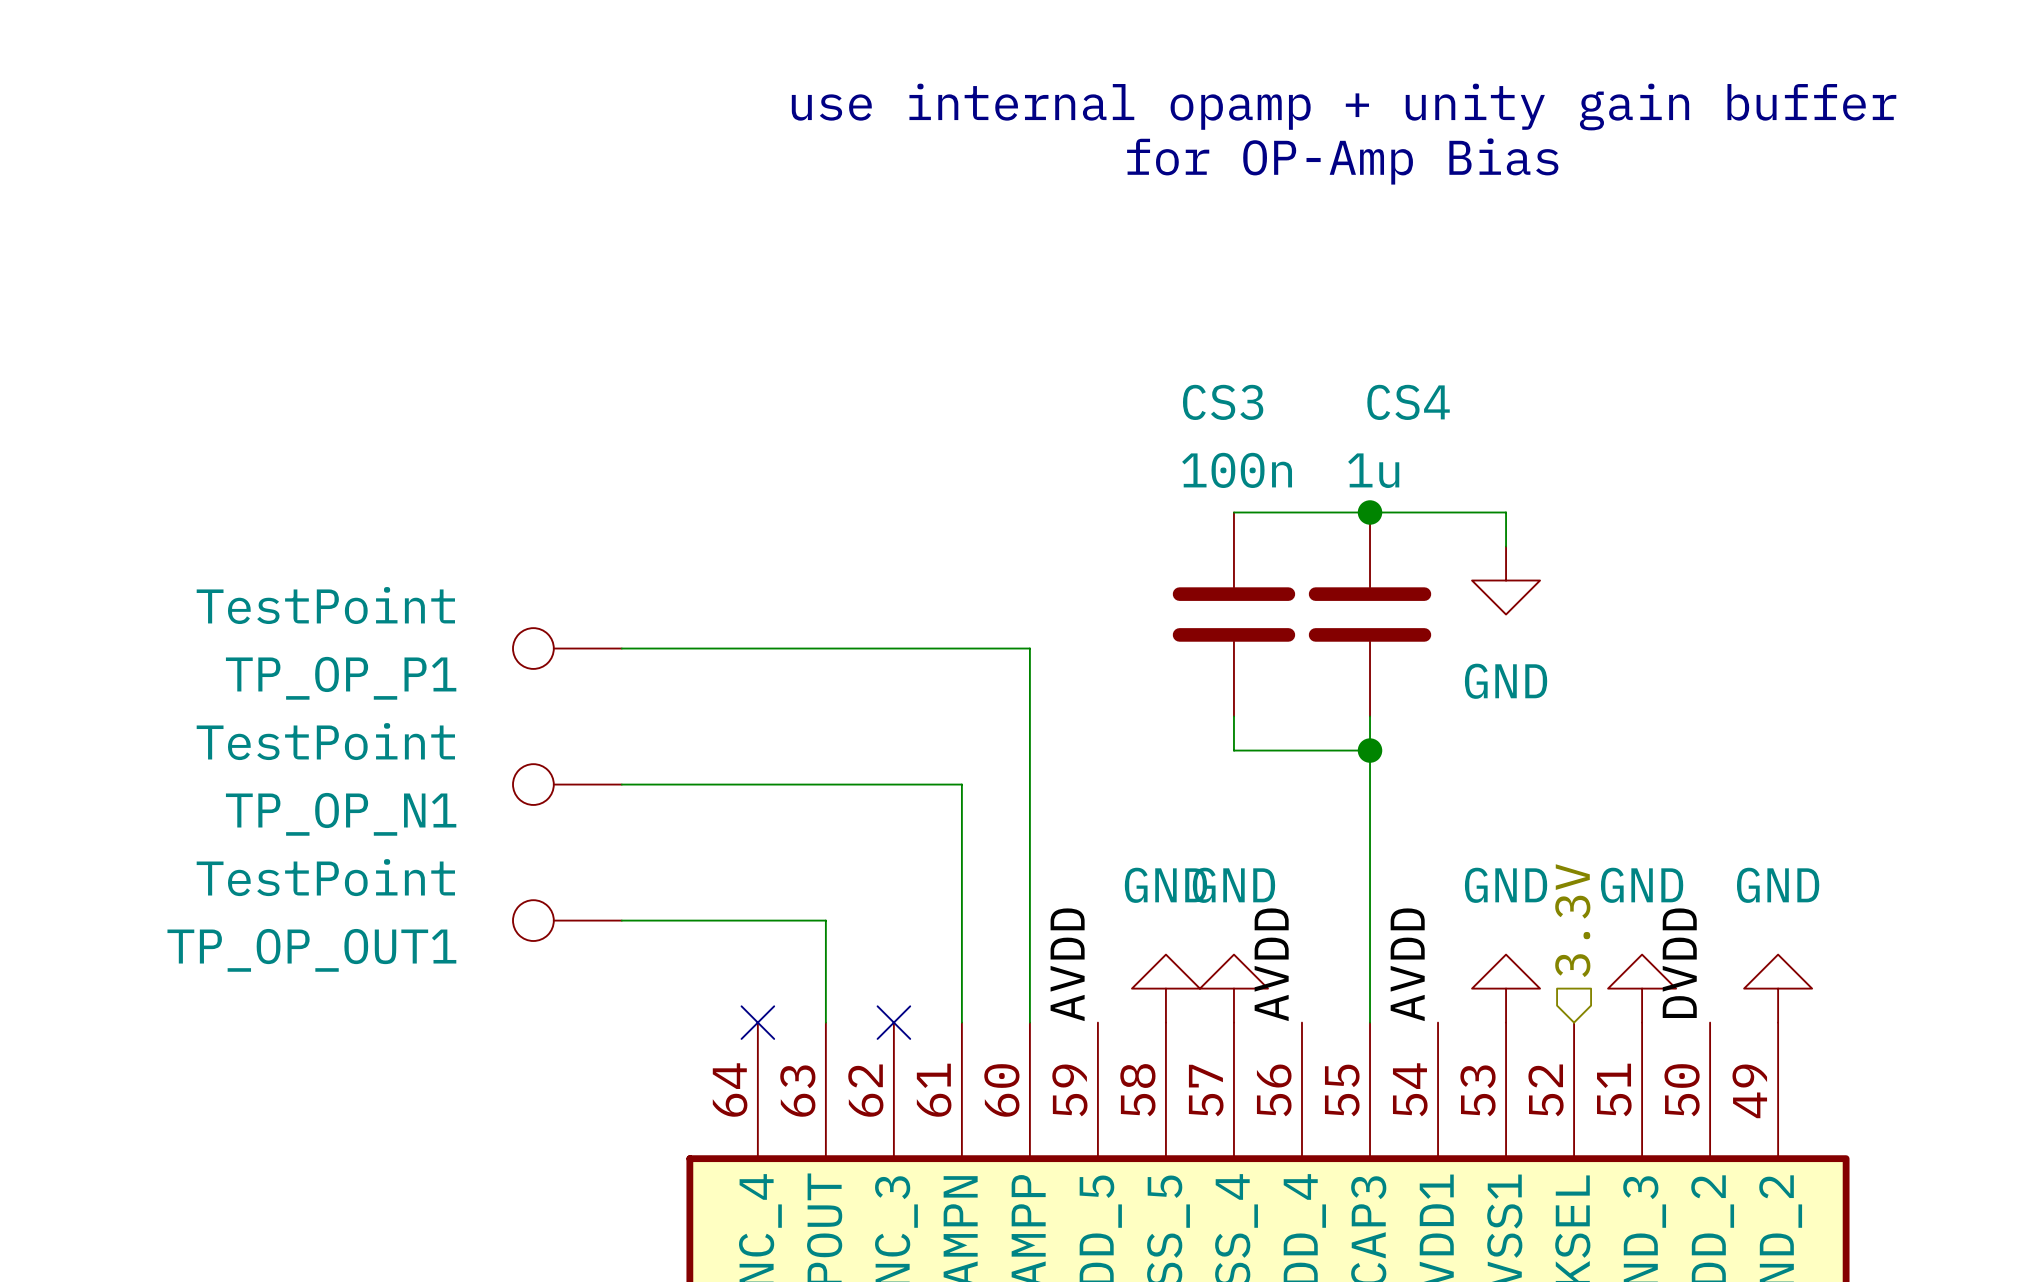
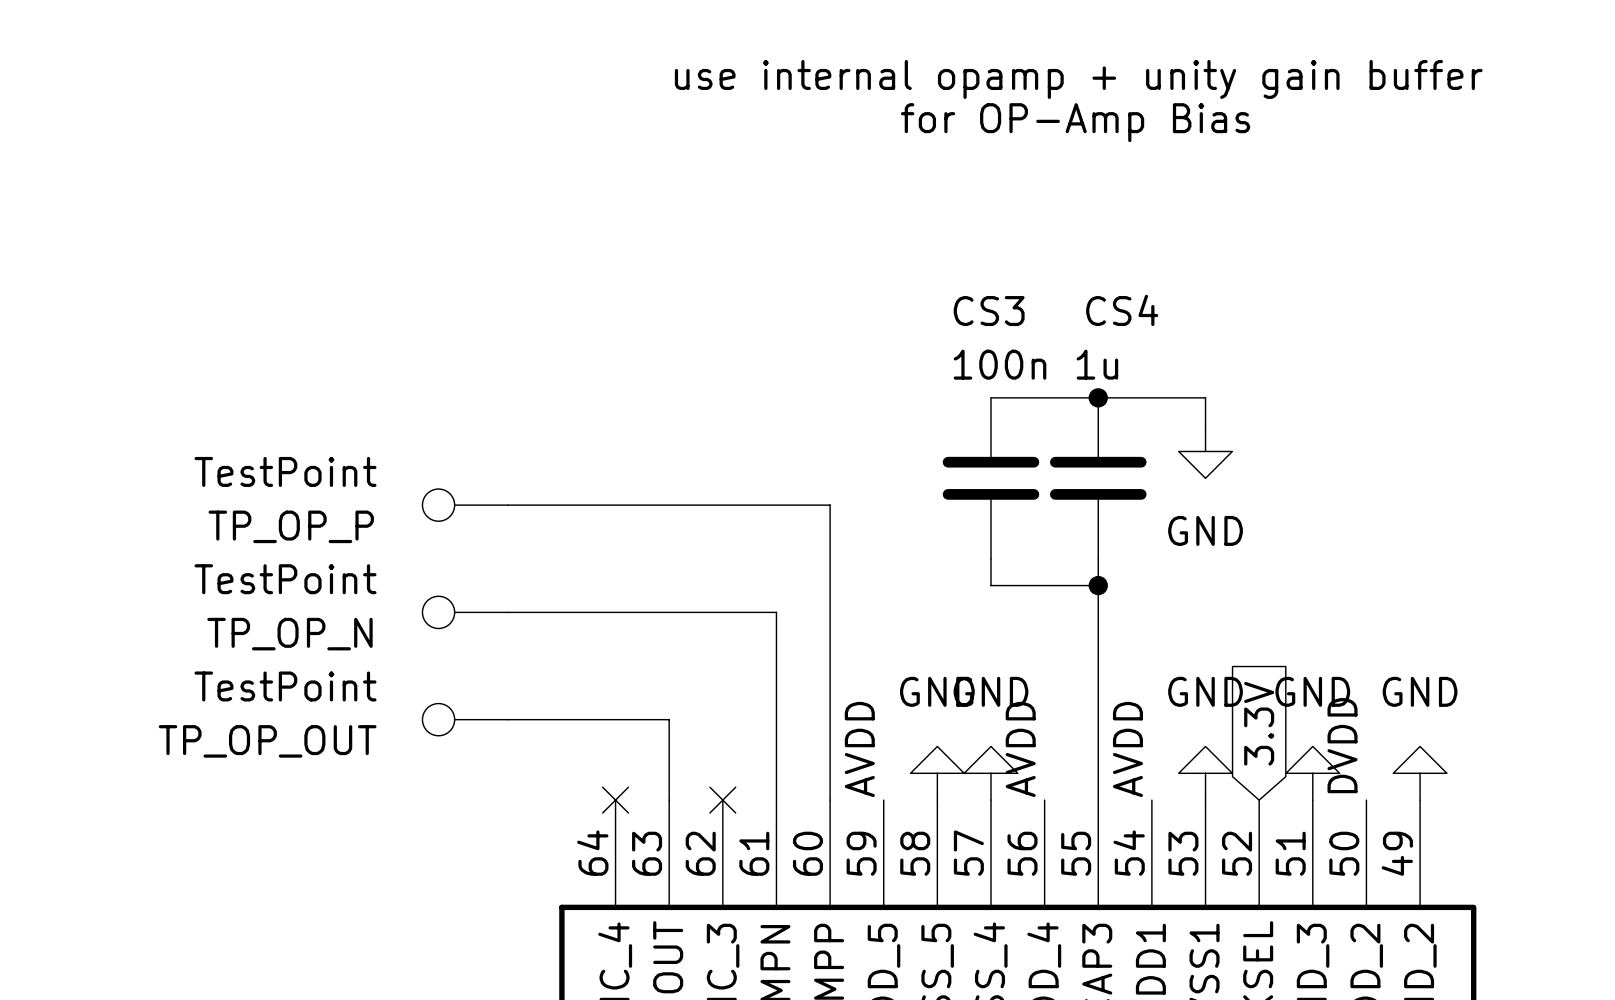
TP_OP_P1 name: TP_OP_P1 (341, 678) -> TP_OP_P (291, 526)
TP_OP_N1 name: TP_OP_N1 (341, 814) -> TP_OP_N (289, 634)
hierarchical label: 3.3V (1572, 920) -> none
global label: none -> 3.3V (1259, 723)
TP_OP_OUT1 name: TP_OP_OUT1 (311, 950) -> TP_OP_OUT (267, 741)

